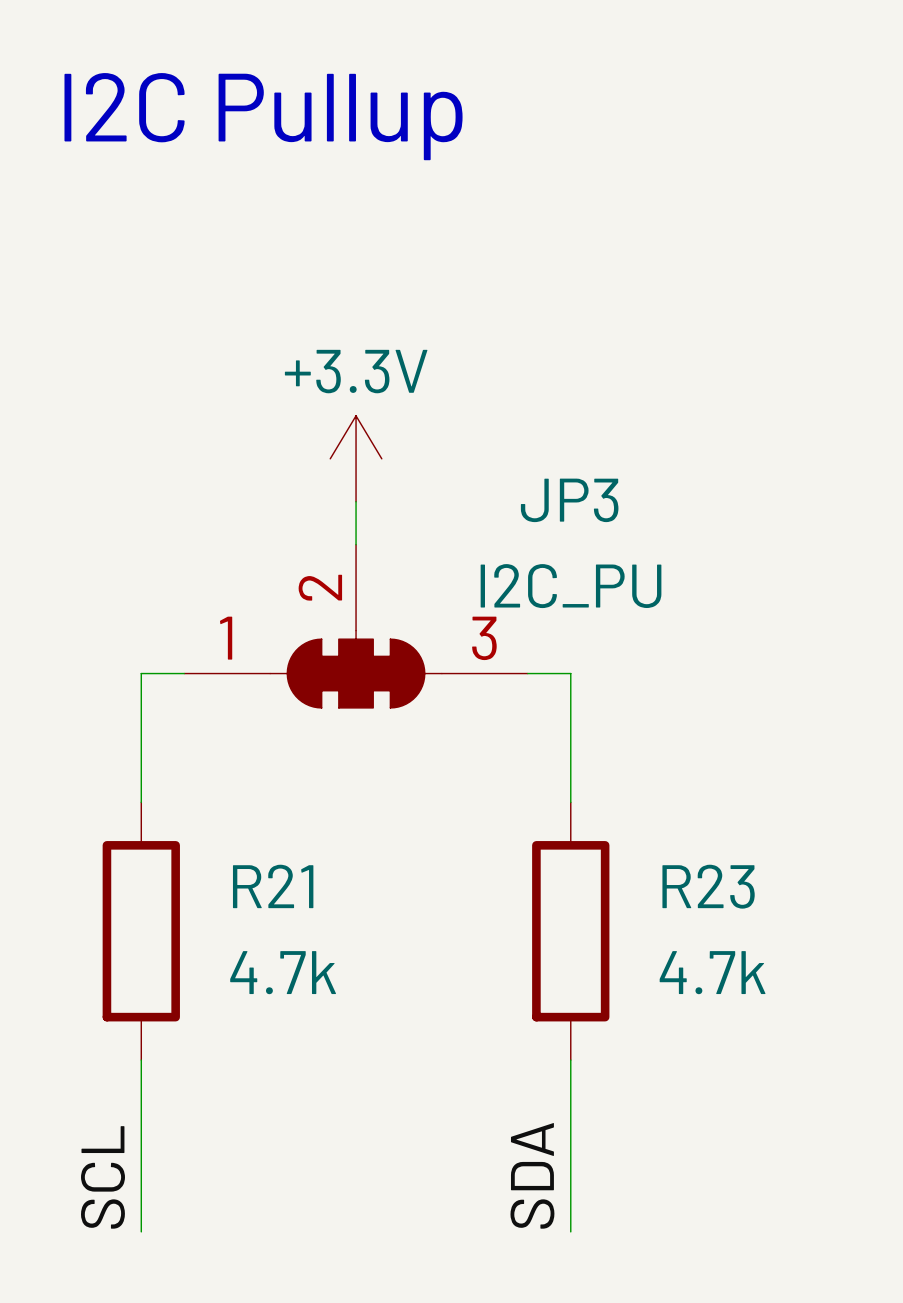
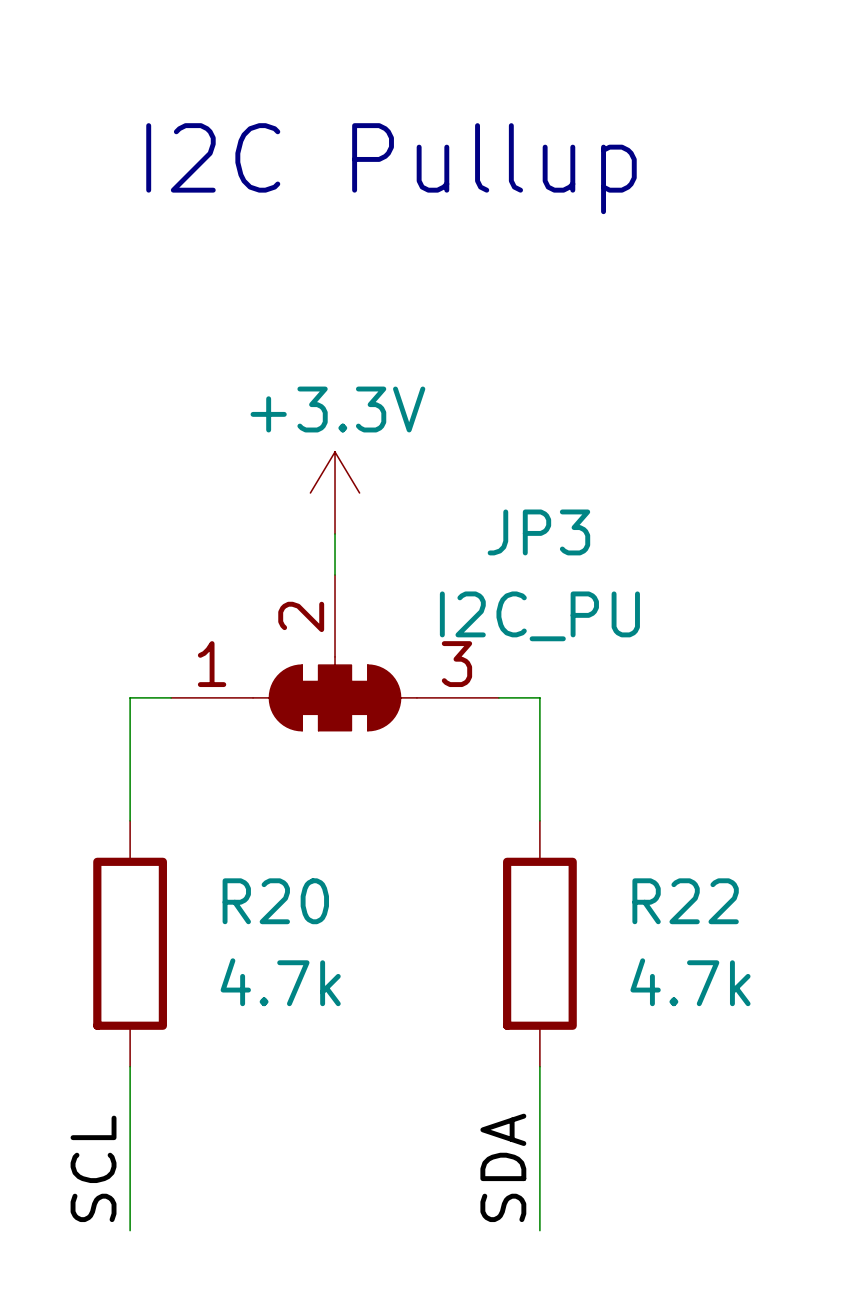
text position: I2C Pullup (263, 116) -> I2C Pullup (391, 168)
R21 name: R21 (273, 886) -> R20 (275, 901)
R23 name: R23 (708, 886) -> R22 (685, 901)

